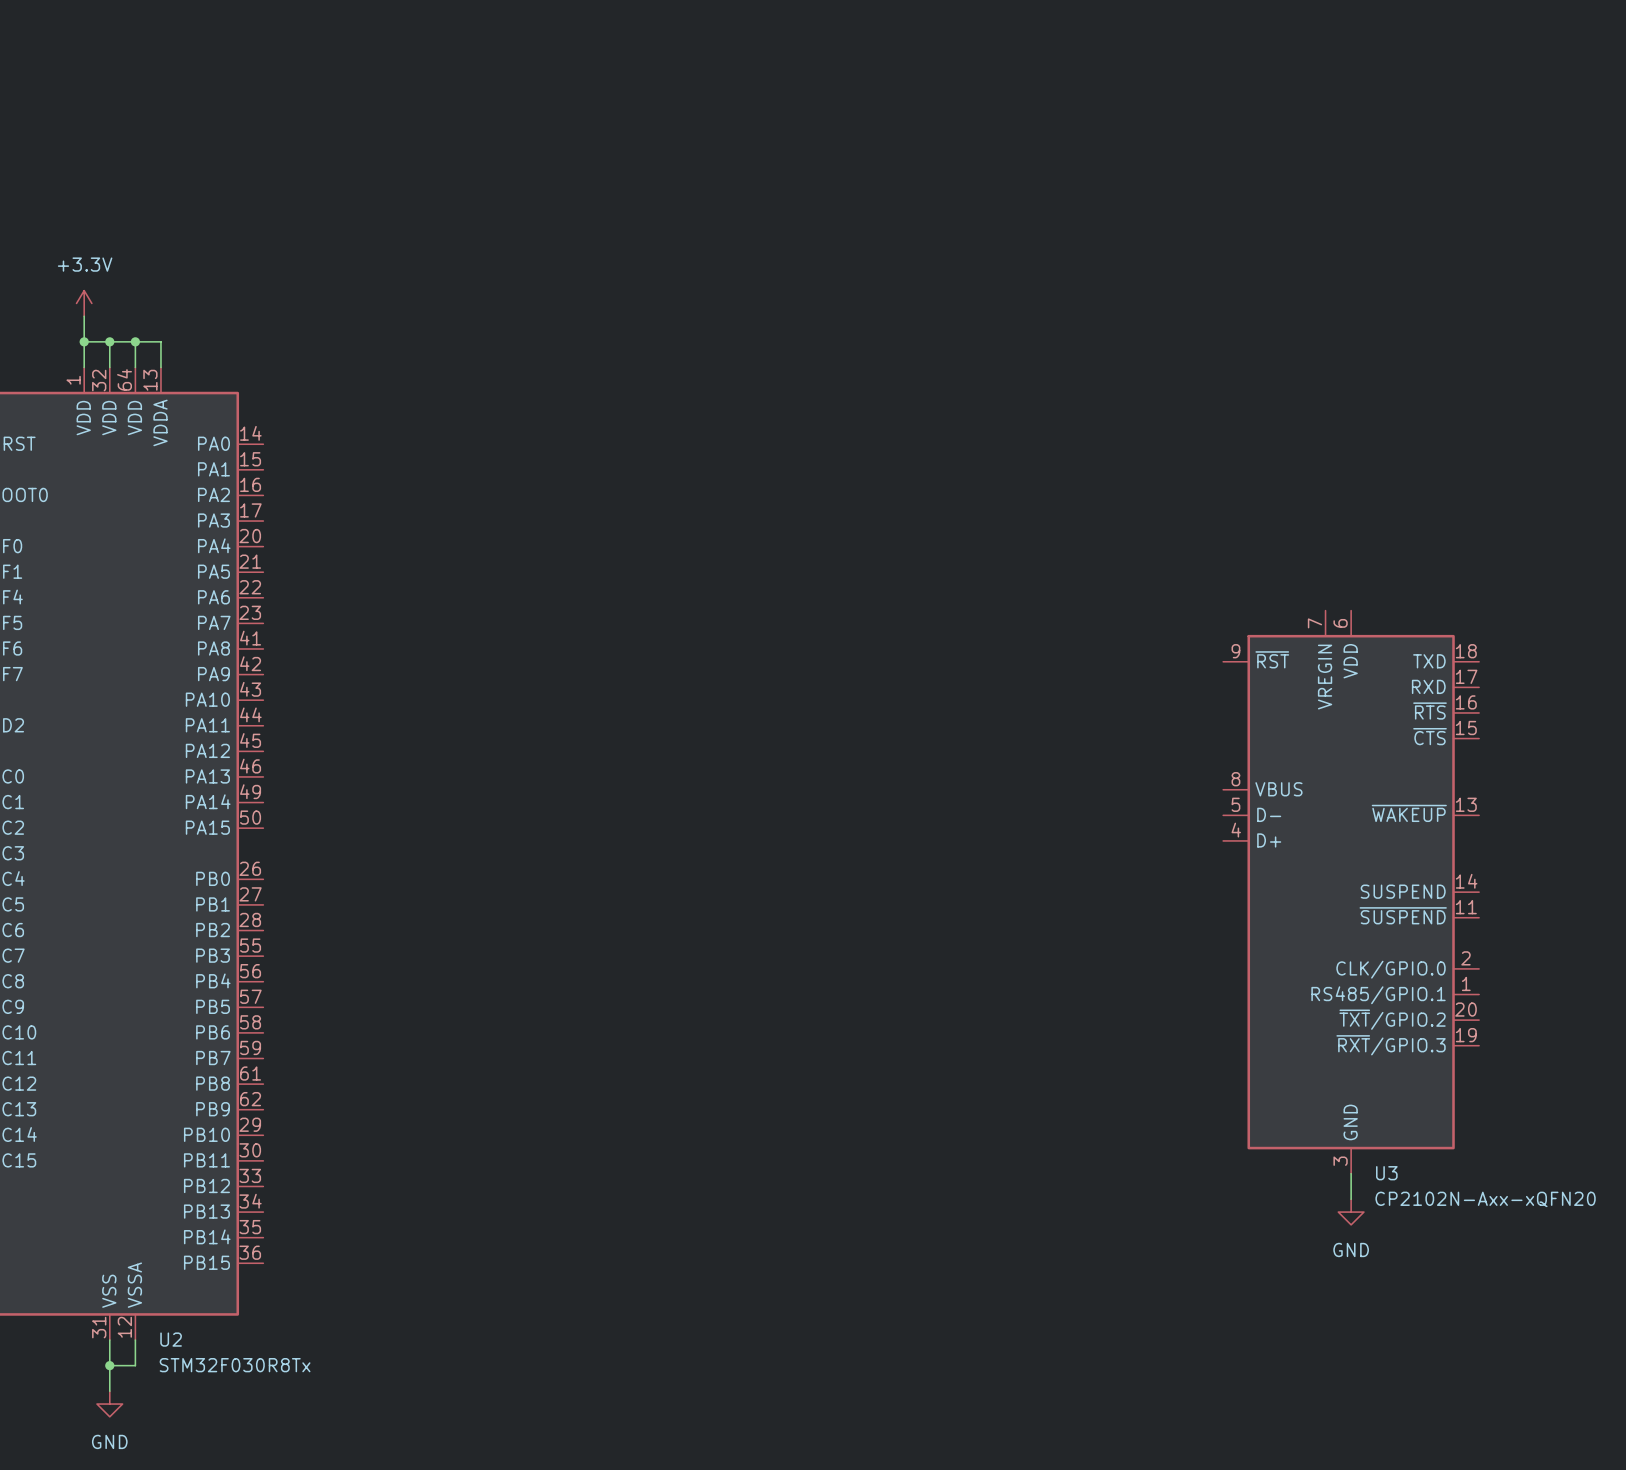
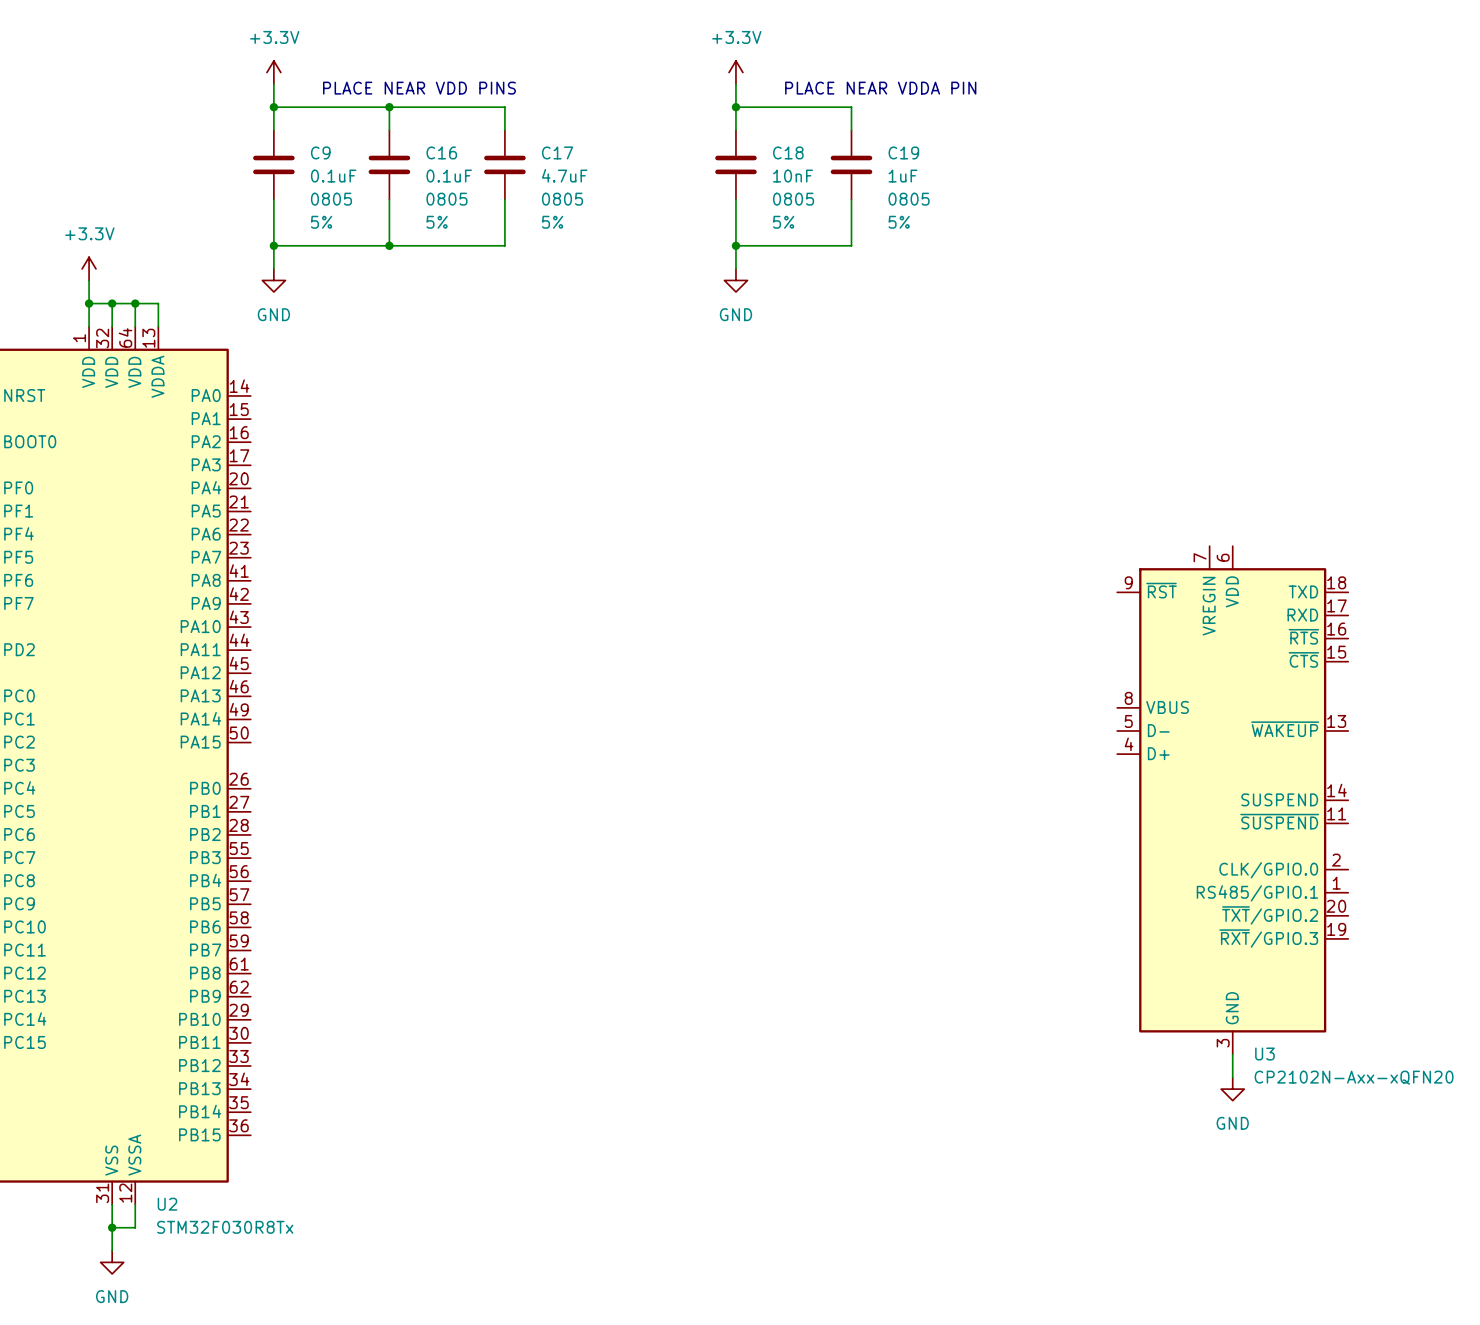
power symbol: none -> +3.3V (273, 72)
power symbol: none -> +3.3V (735, 72)
wire: none -> (273, 84) (273, 130)
wire: none -> (735, 84) (735, 130)
text: none -> PLACE NEAR VDD PINS (419, 88)
text: none -> PLACE NEAR VDDA PIN (880, 88)
wire: none -> (273, 107) (504, 107) (504, 130)
junction: none -> (273, 107)
wire: none -> (389, 107) (389, 130)
junction: none -> (389, 107)
wire: none -> (735, 107) (851, 107) (851, 130)
junction: none -> (735, 107)
C9: none -> 0.1uF (273, 164)
C16: none -> 0.1uF (389, 164)
C17: none -> 4.7uF (504, 164)
C18: none -> 10nF (735, 164)
C19: none -> 1uF (851, 164)
wire: none -> (273, 199) (273, 268)
wire: none -> (389, 199) (389, 245)
wire: none -> (504, 199) (504, 245) (273, 245)
wire: none -> (735, 199) (735, 268)
wire: none -> (851, 199) (851, 245) (735, 245)
junction: none -> (273, 245)
junction: none -> (389, 245)
junction: none -> (735, 245)
power symbol: none -> GND (273, 280)
power symbol: none -> GND (735, 280)

